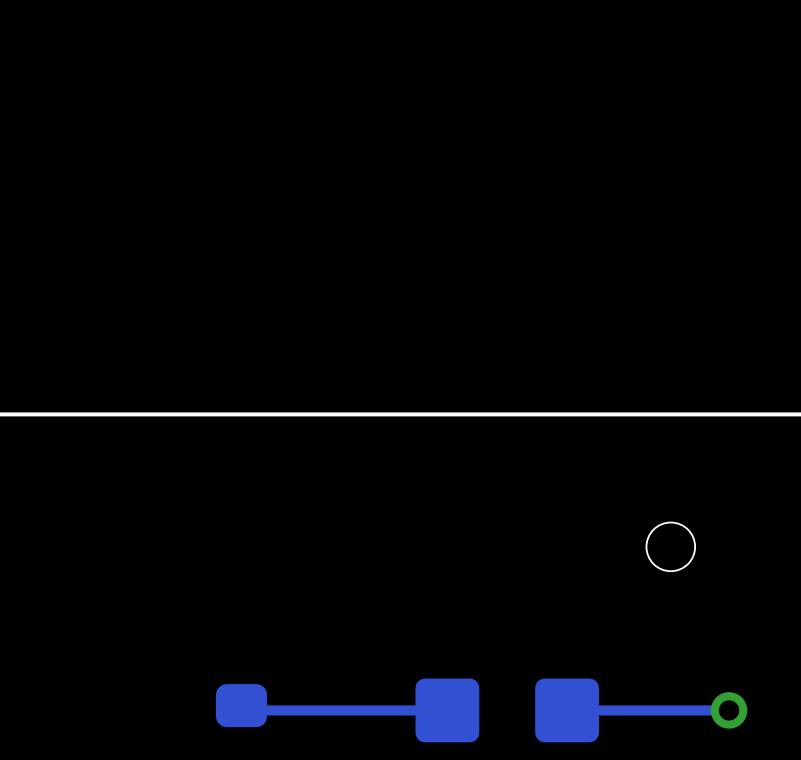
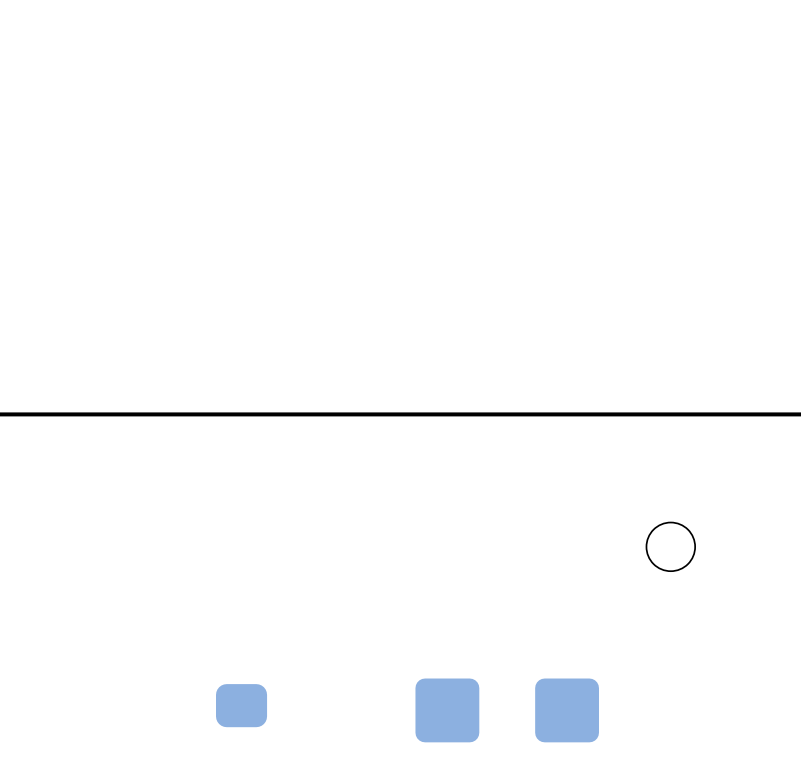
bottom track: (241, 705) (246, 710) (447, 710) -> none
bottom track: (567, 710) (729, 710) -> none
via: (729, 710) -> none

